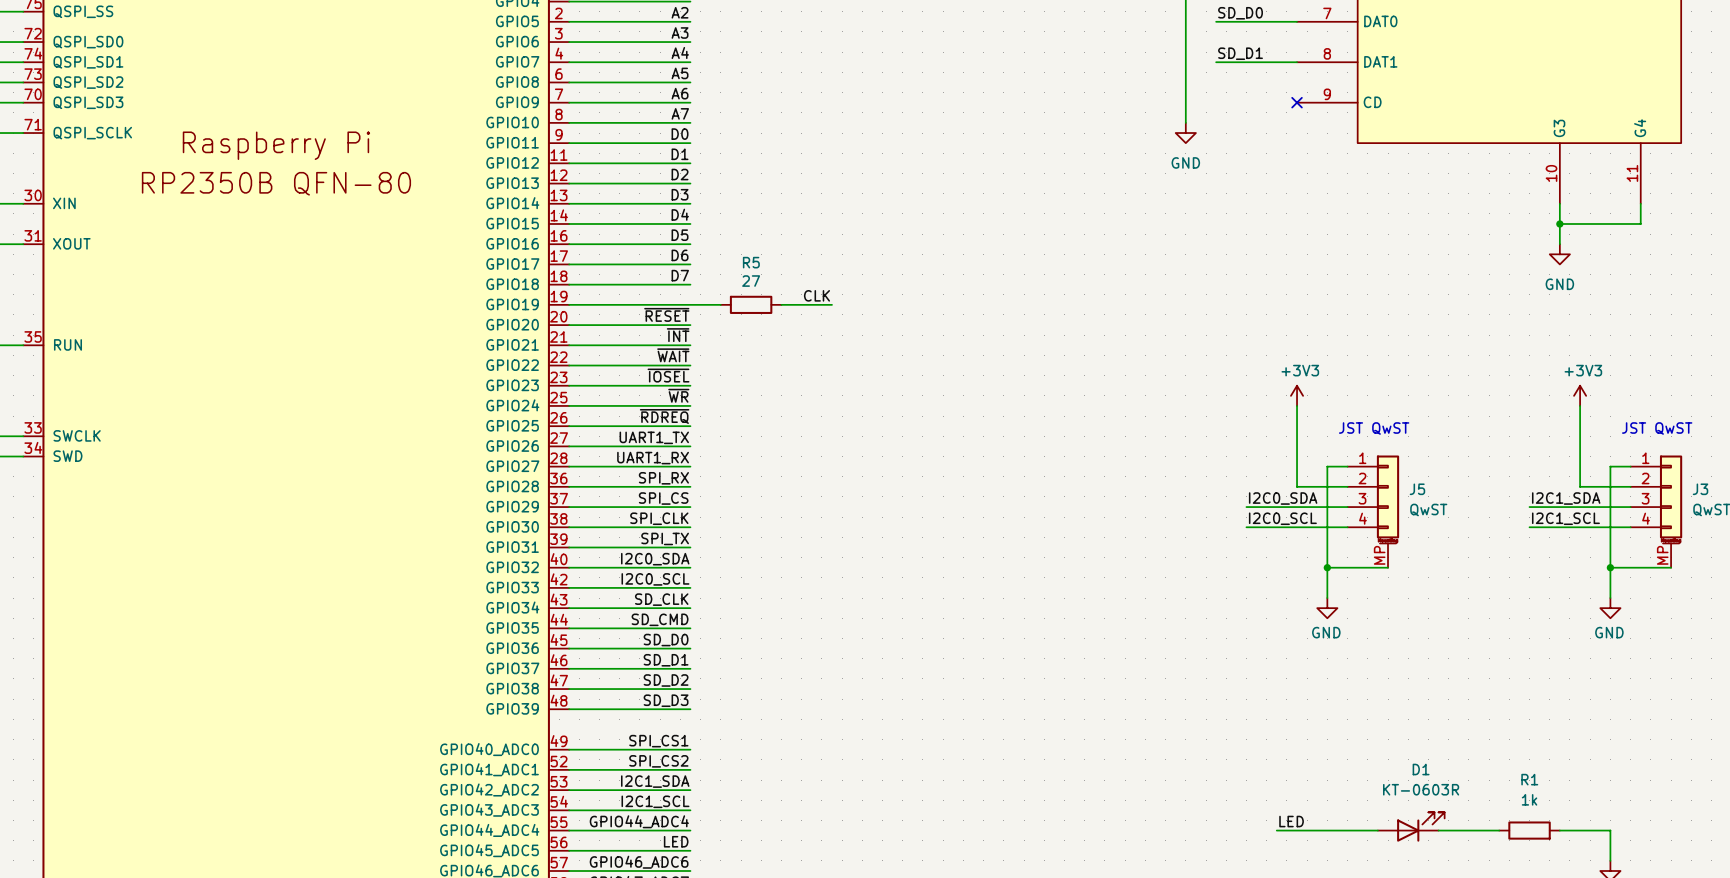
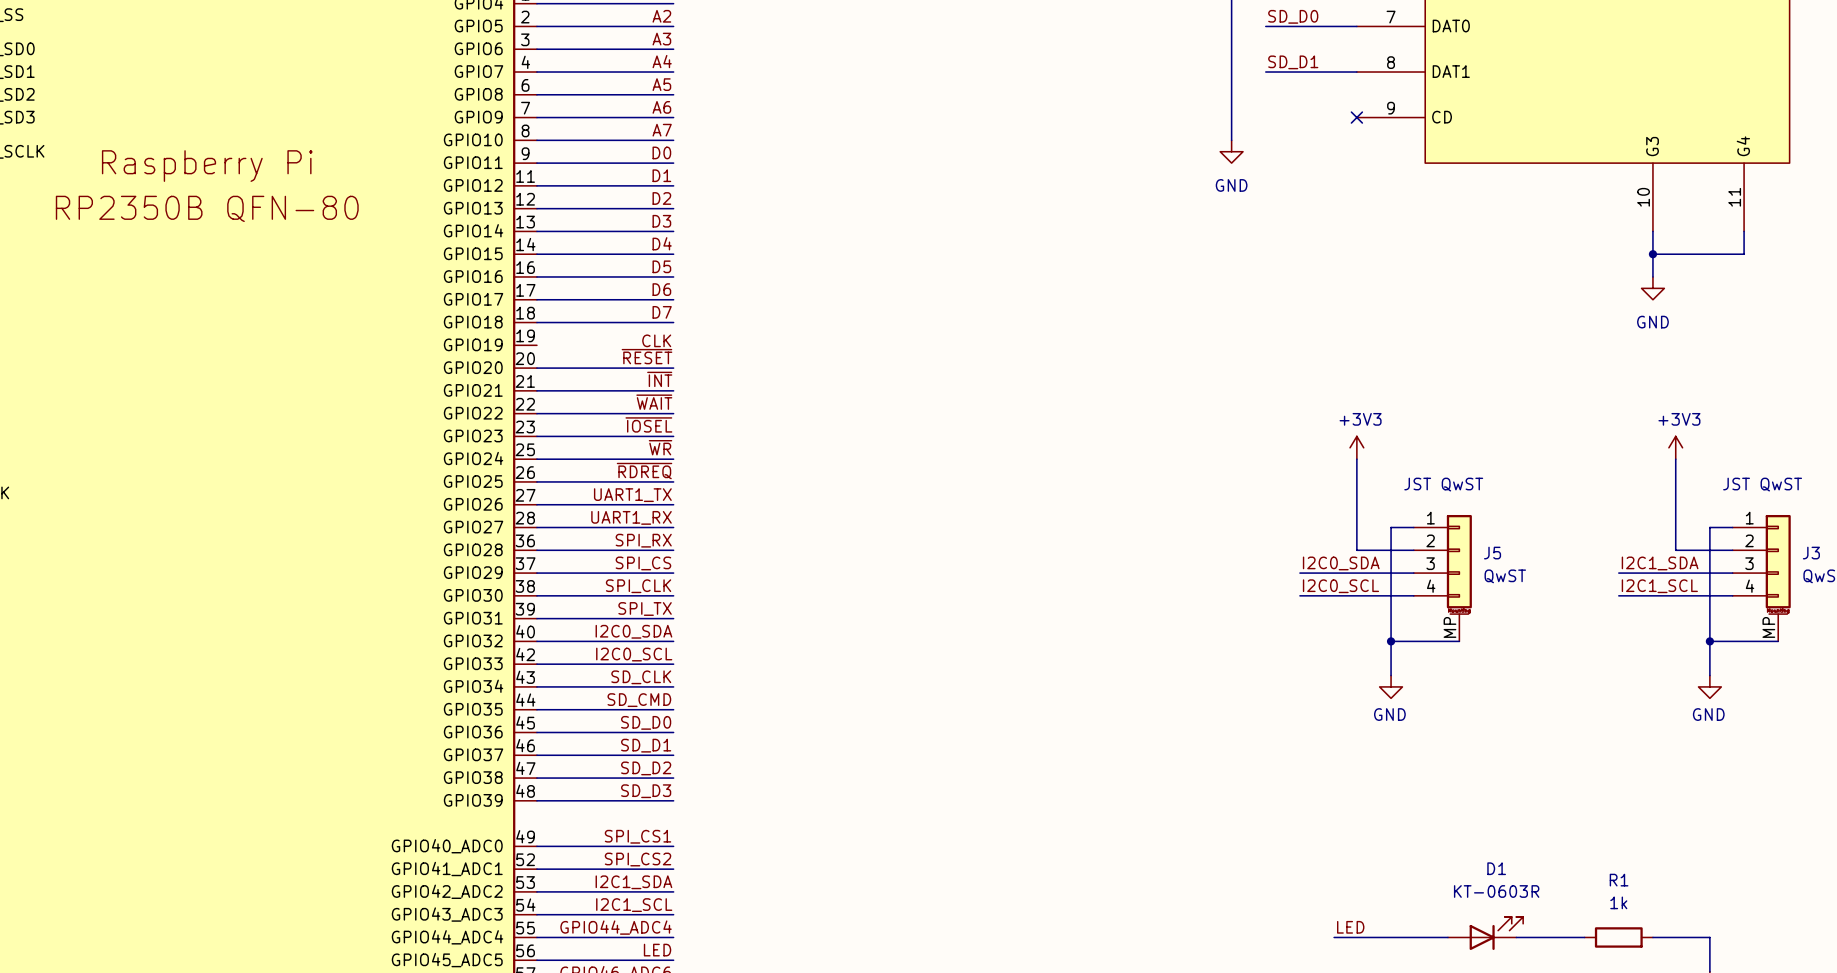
label position: CLK (816, 295) -> CLK (656, 340)
wire: (569, 304) (720, 304) -> none
R5: 27 (751, 304) -> none
wire: (781, 304) (831, 304) -> none

